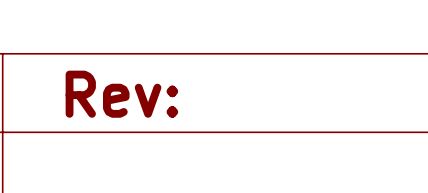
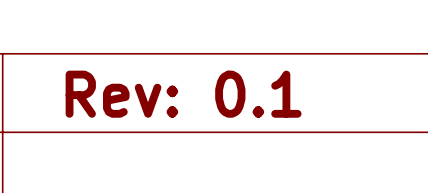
title block: Rev: (121, 94) -> Rev: 0.1 (183, 94)

